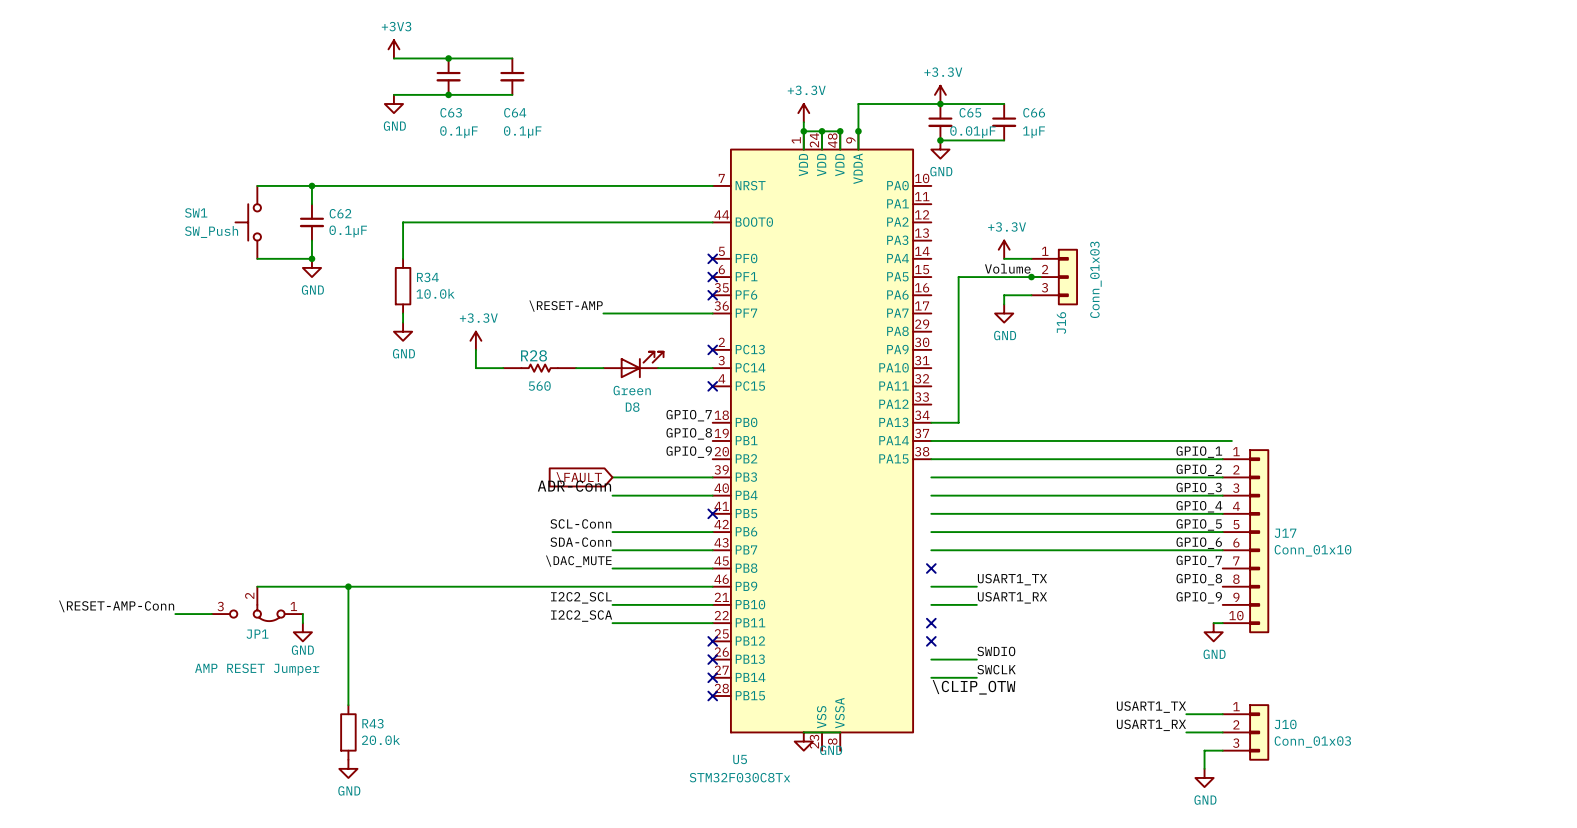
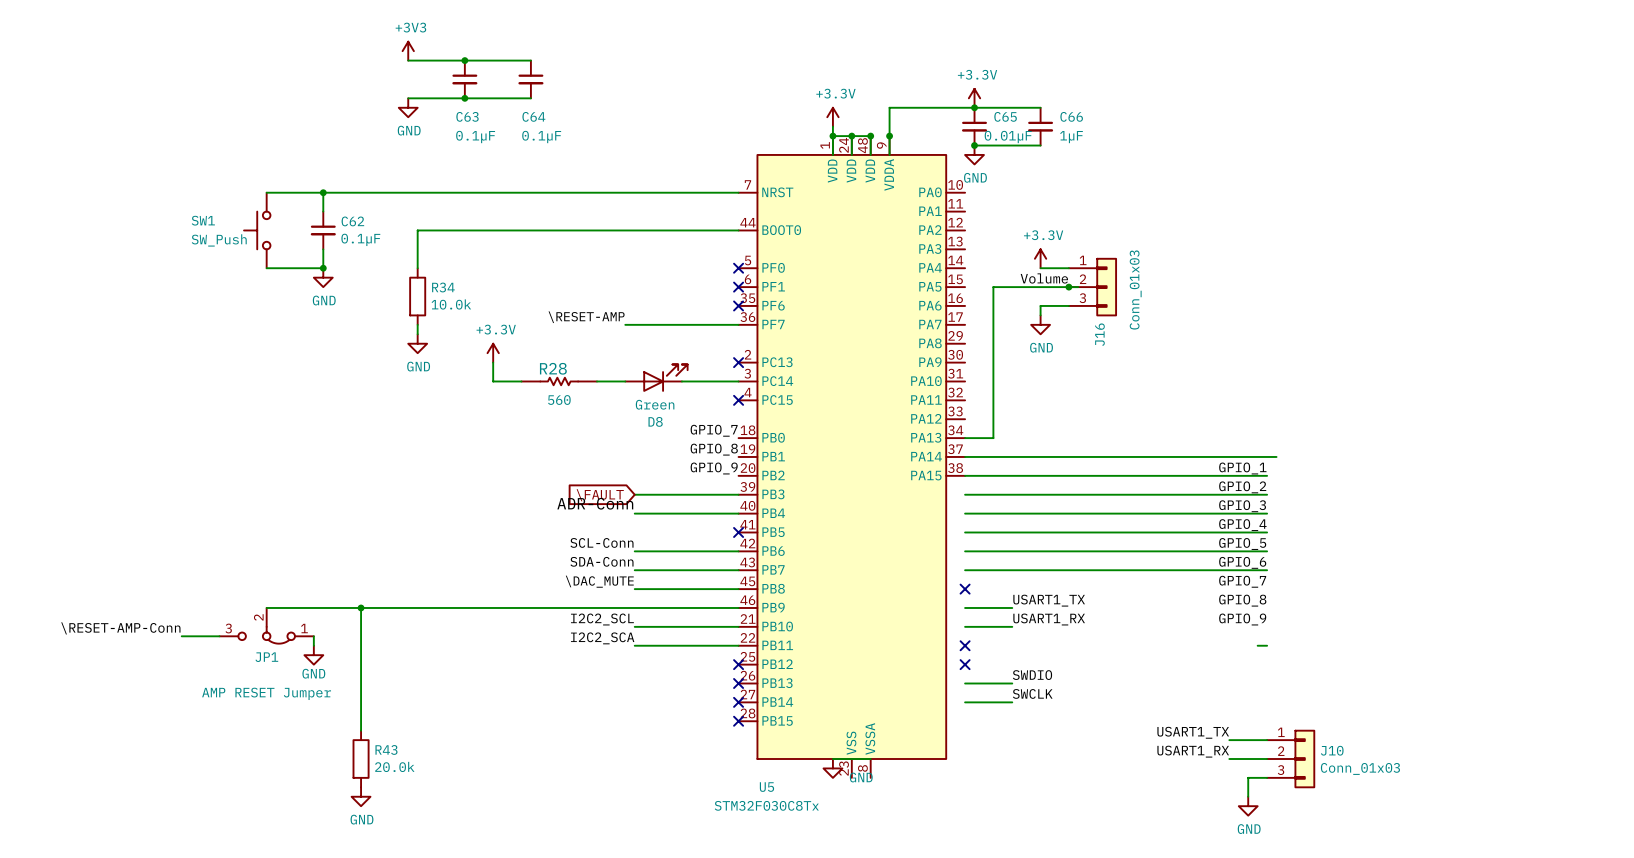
J17: Conn_01x10 (1245, 541) -> none
power symbol: GND (1213, 632) -> none
label: \CLIP_OTW (974, 687) -> none

